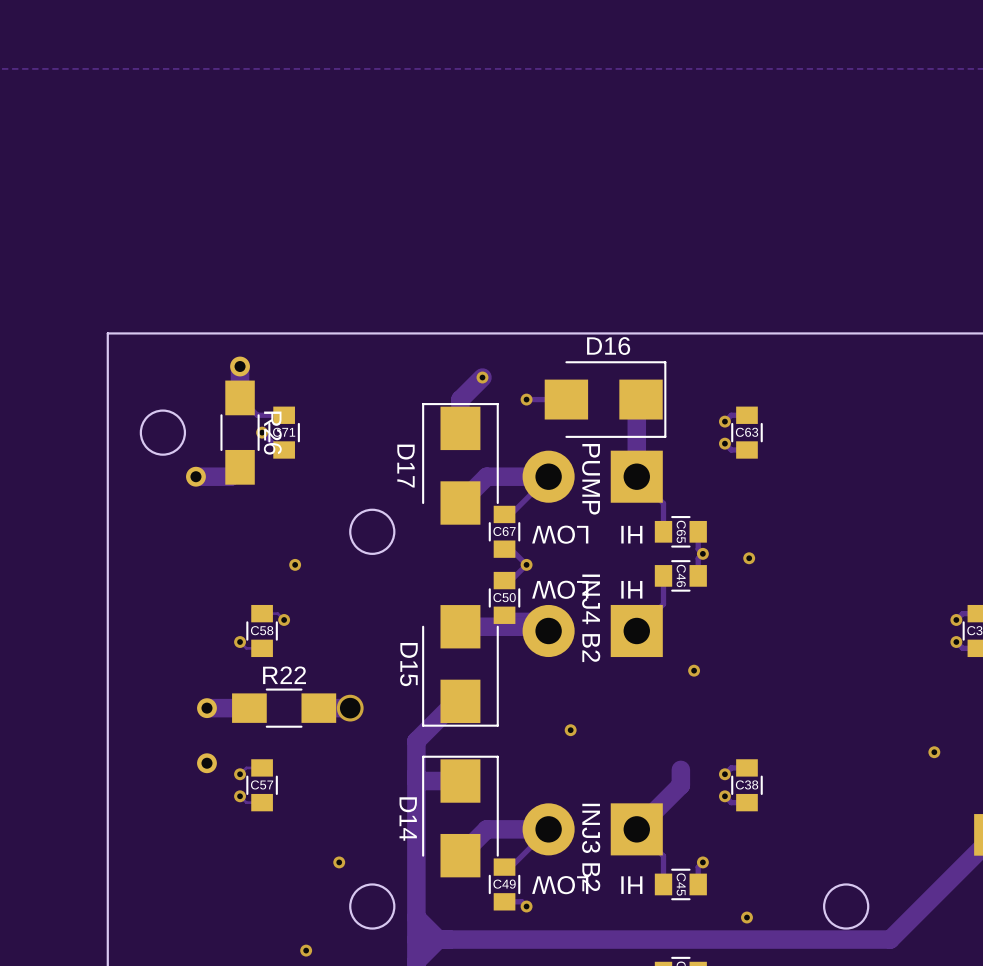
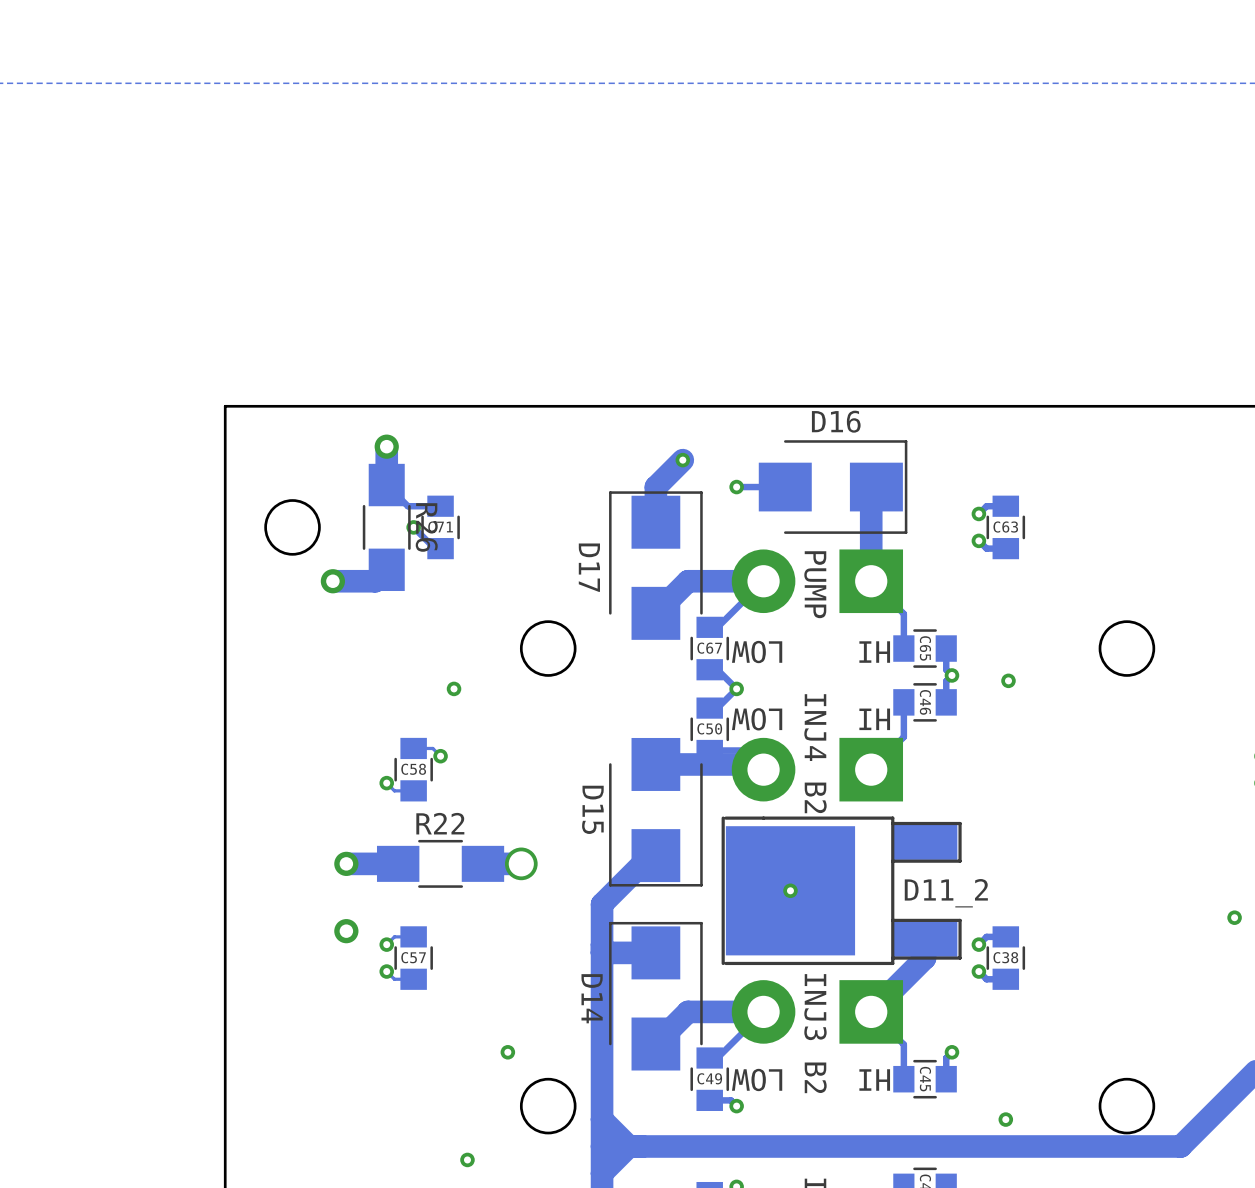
round board edge: none -> [1098, 620, 1156, 677]
via: (694, 670) -> none
D11_2: none -> (841, 890)

